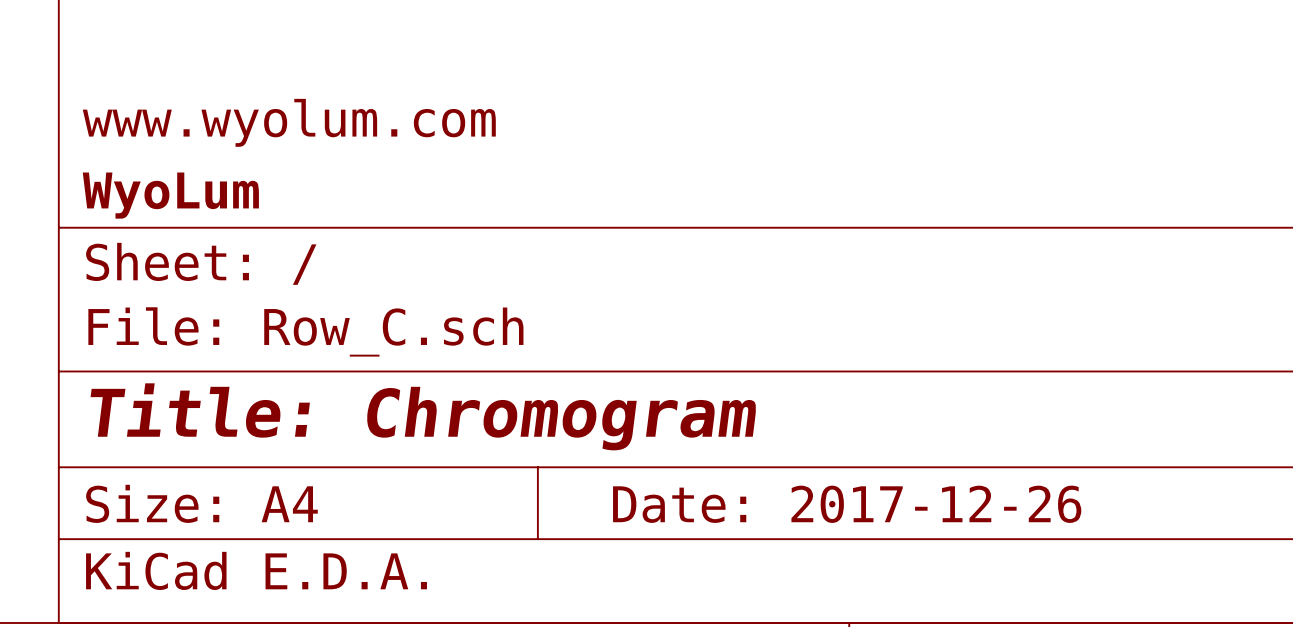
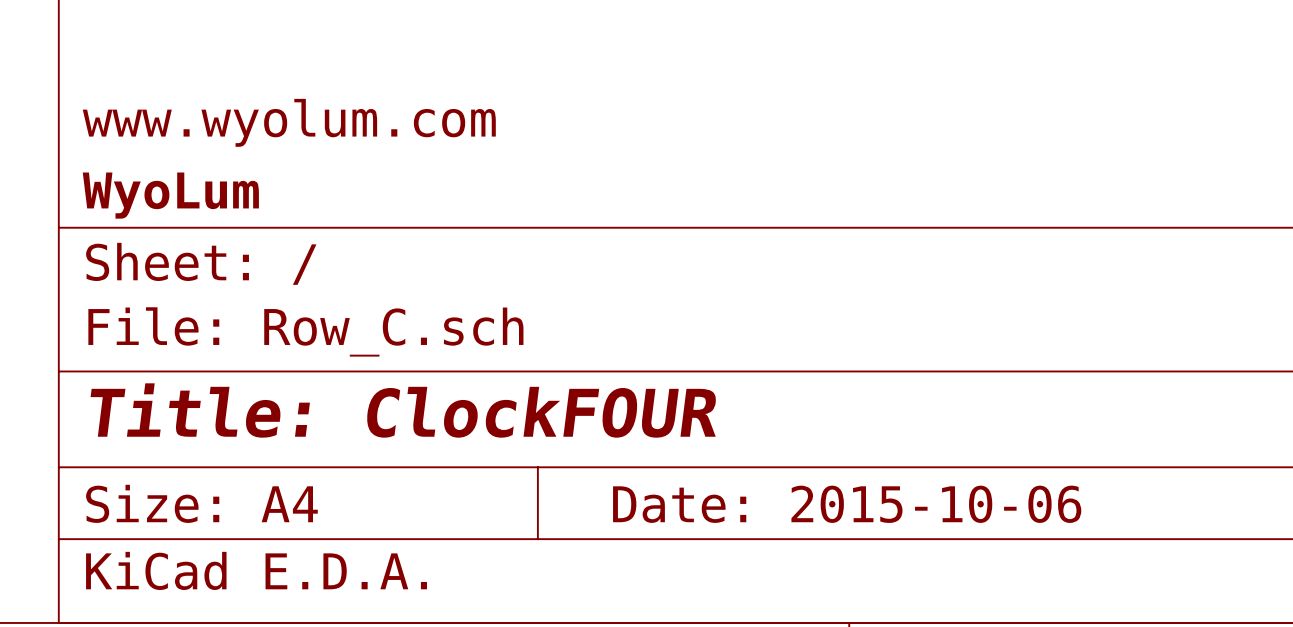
title block: Title: Chromogram (423, 416) -> Title: ClockFOUR (403, 410)
title block: Date: 2017-12-26 (847, 504) -> Date: 2015-10-06 (847, 504)

